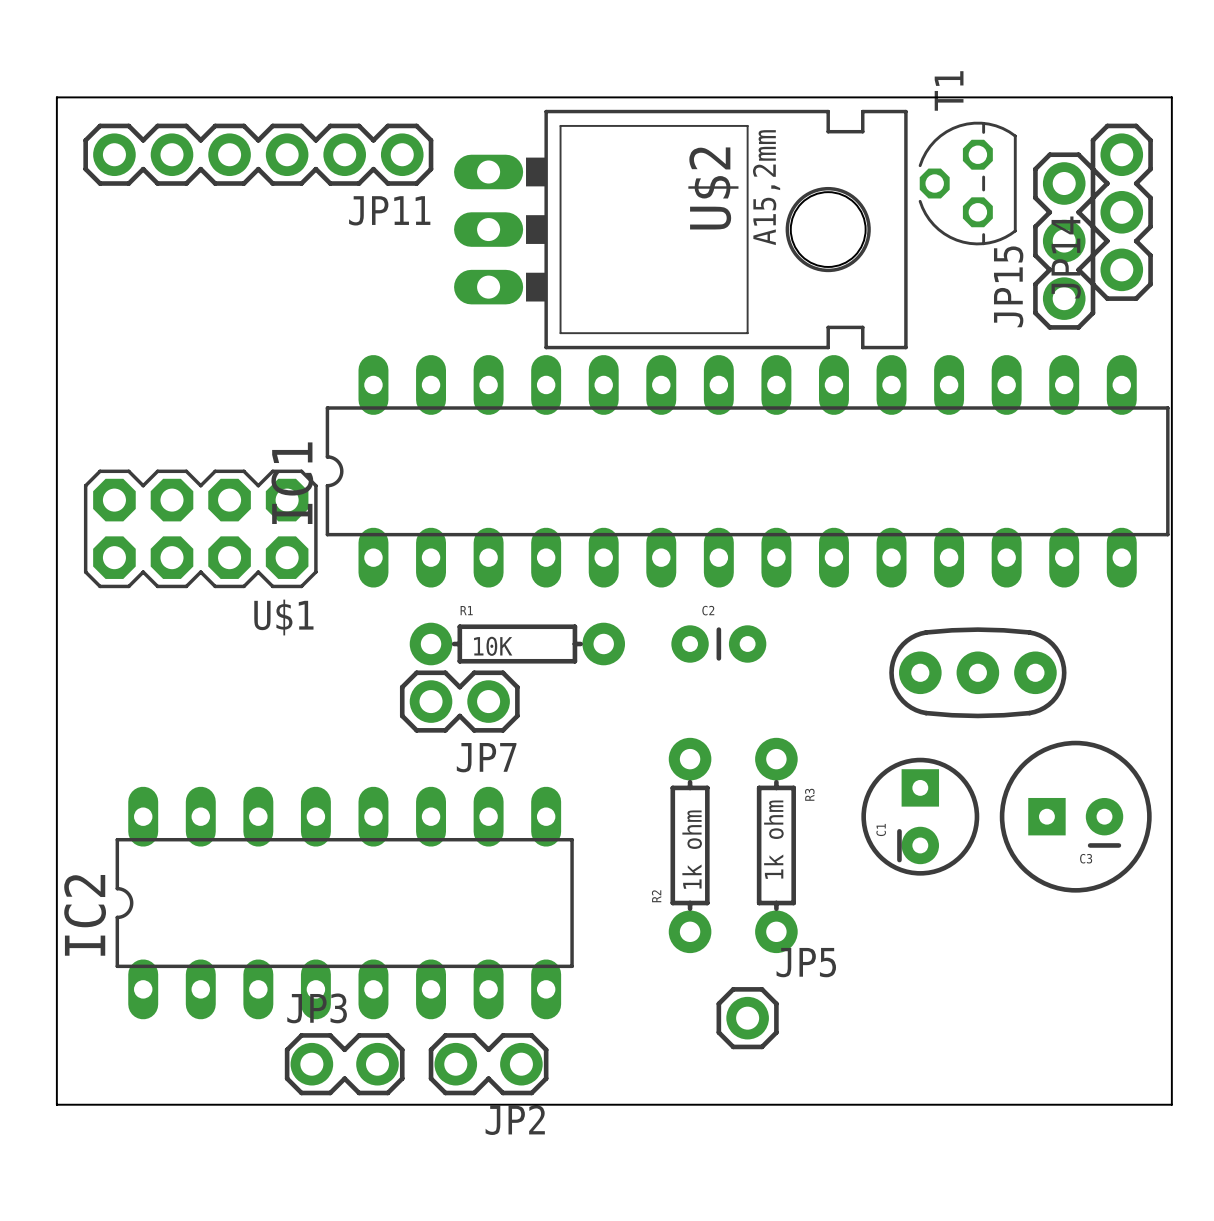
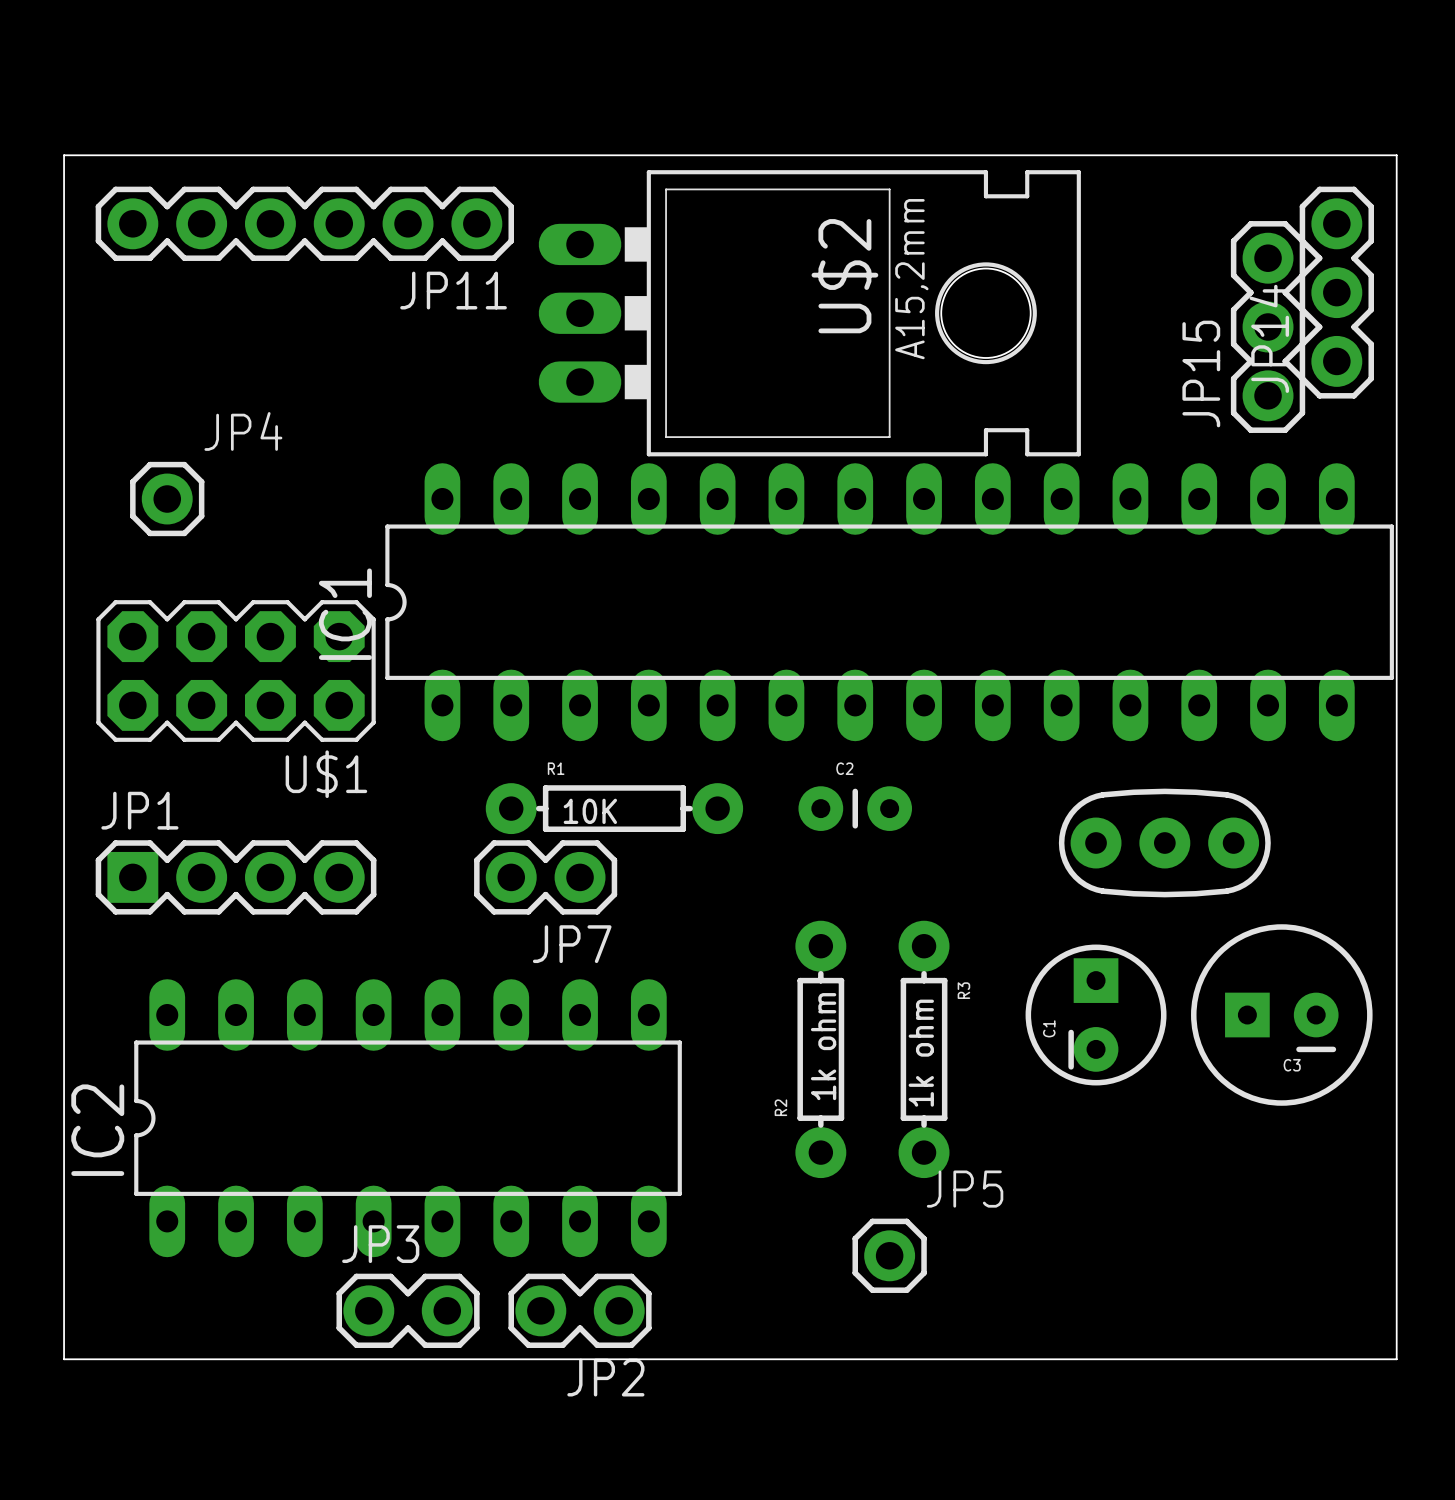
T1: (967, 183) -> none
JP4: none -> (167, 499)
JP1: none -> (236, 877)

